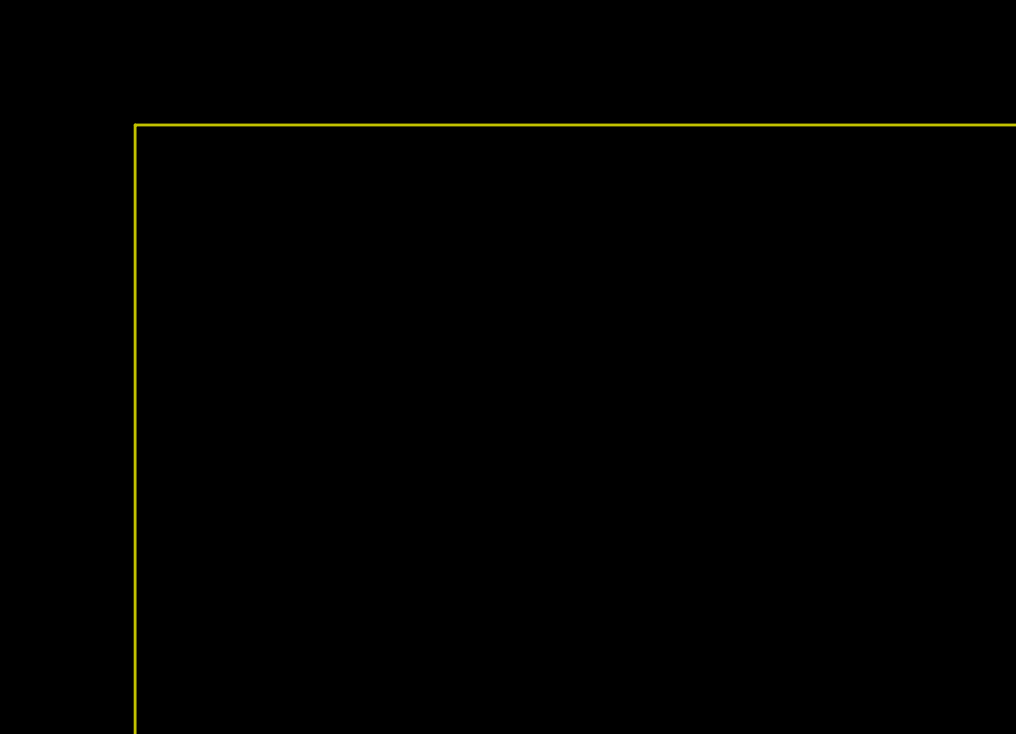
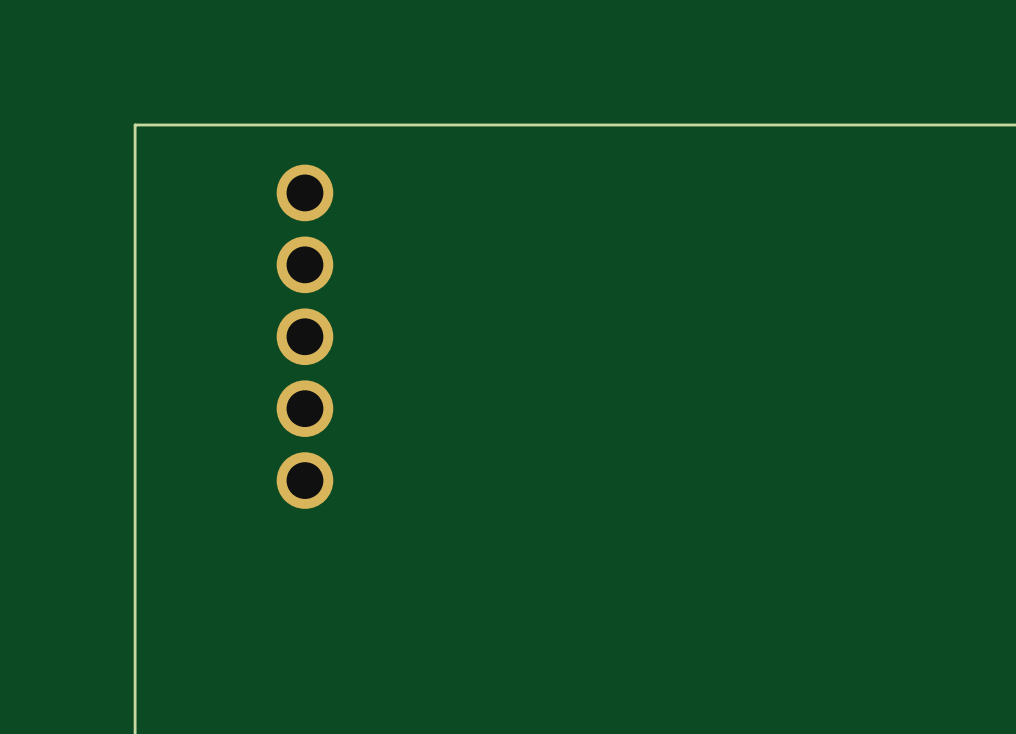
part: none -> (304, 336)

